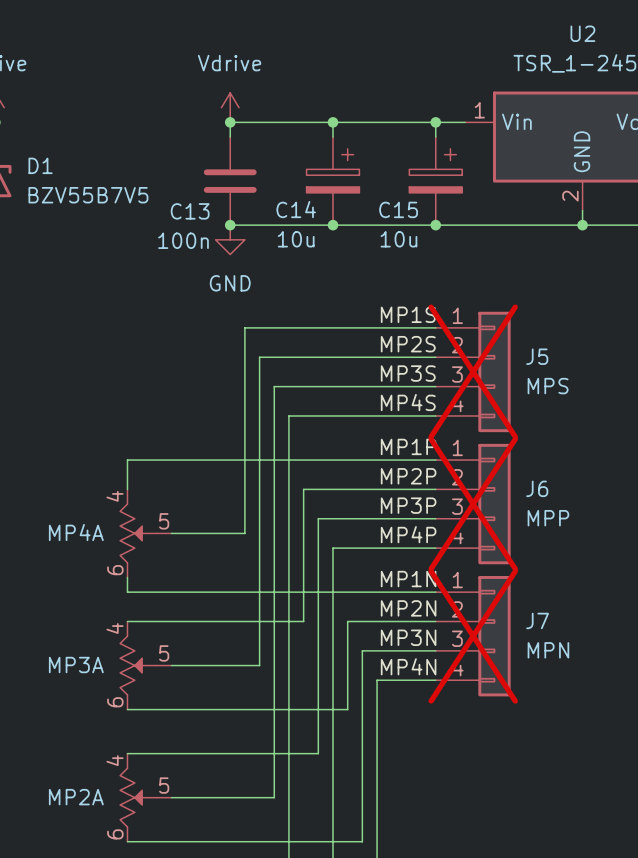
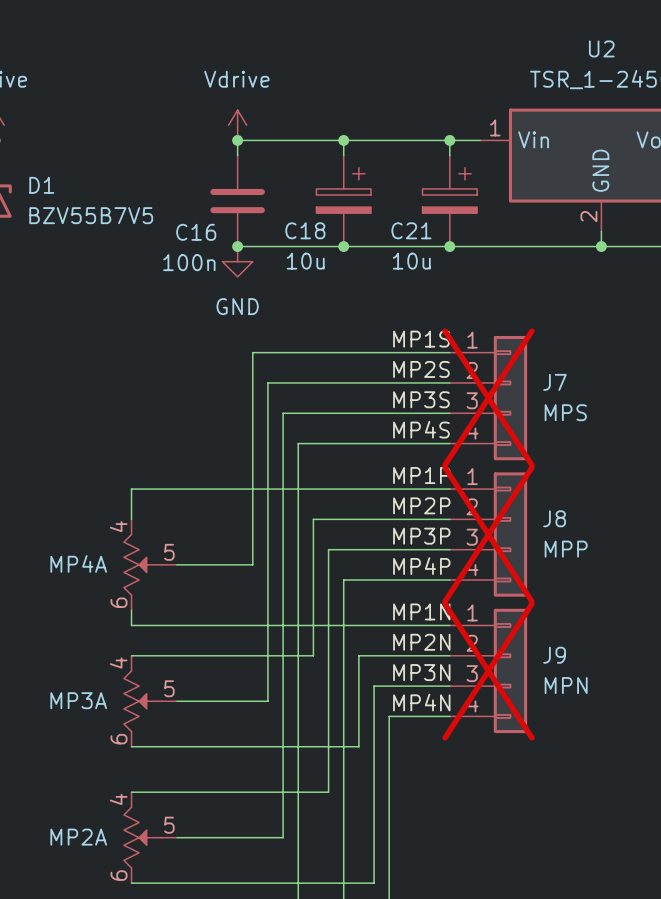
C14 name: C14 (296, 209) -> C18 (305, 230)
C15 name: C15 (398, 209) -> C21 (411, 230)
C13 name: C13 (190, 211) -> C16 (196, 232)
J5 name: J5 (537, 356) -> J7 (554, 382)
J6 name: J6 (537, 488) -> J8 (554, 518)
J7 name: J7 (537, 620) -> J9 (554, 655)

